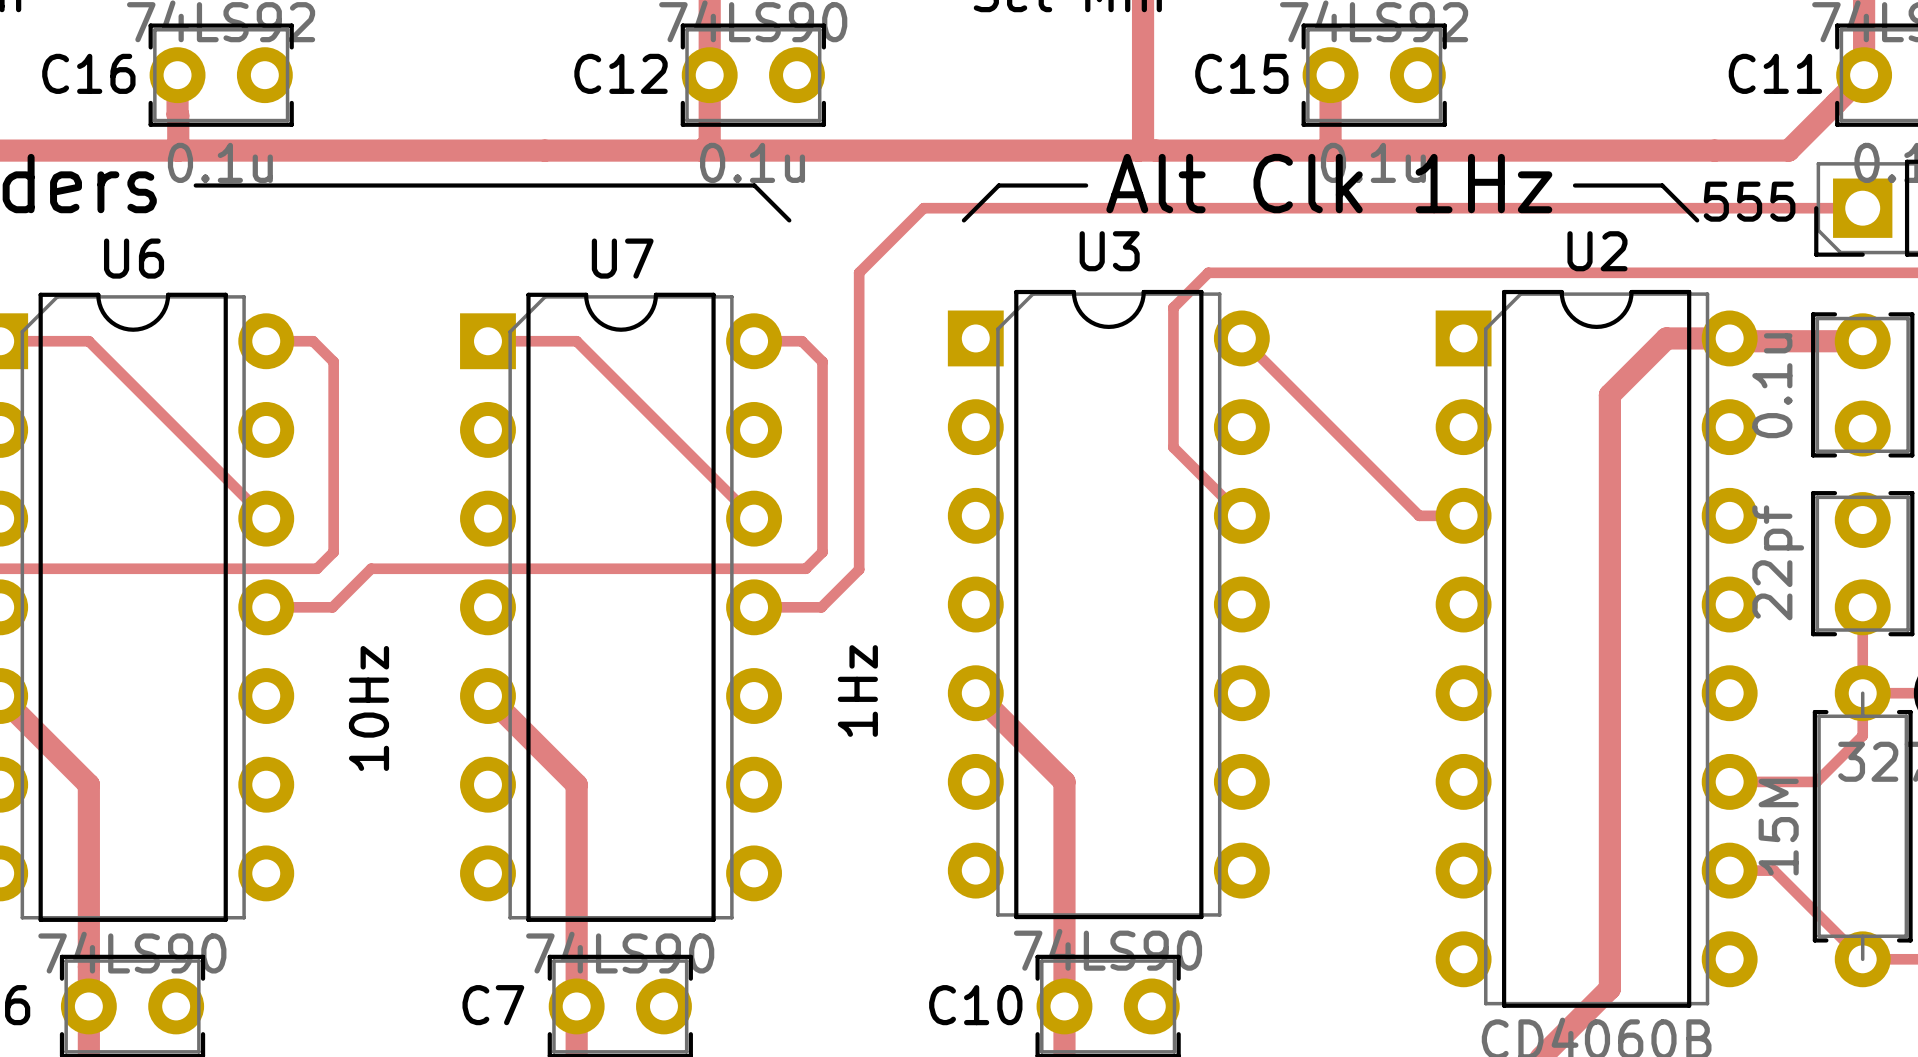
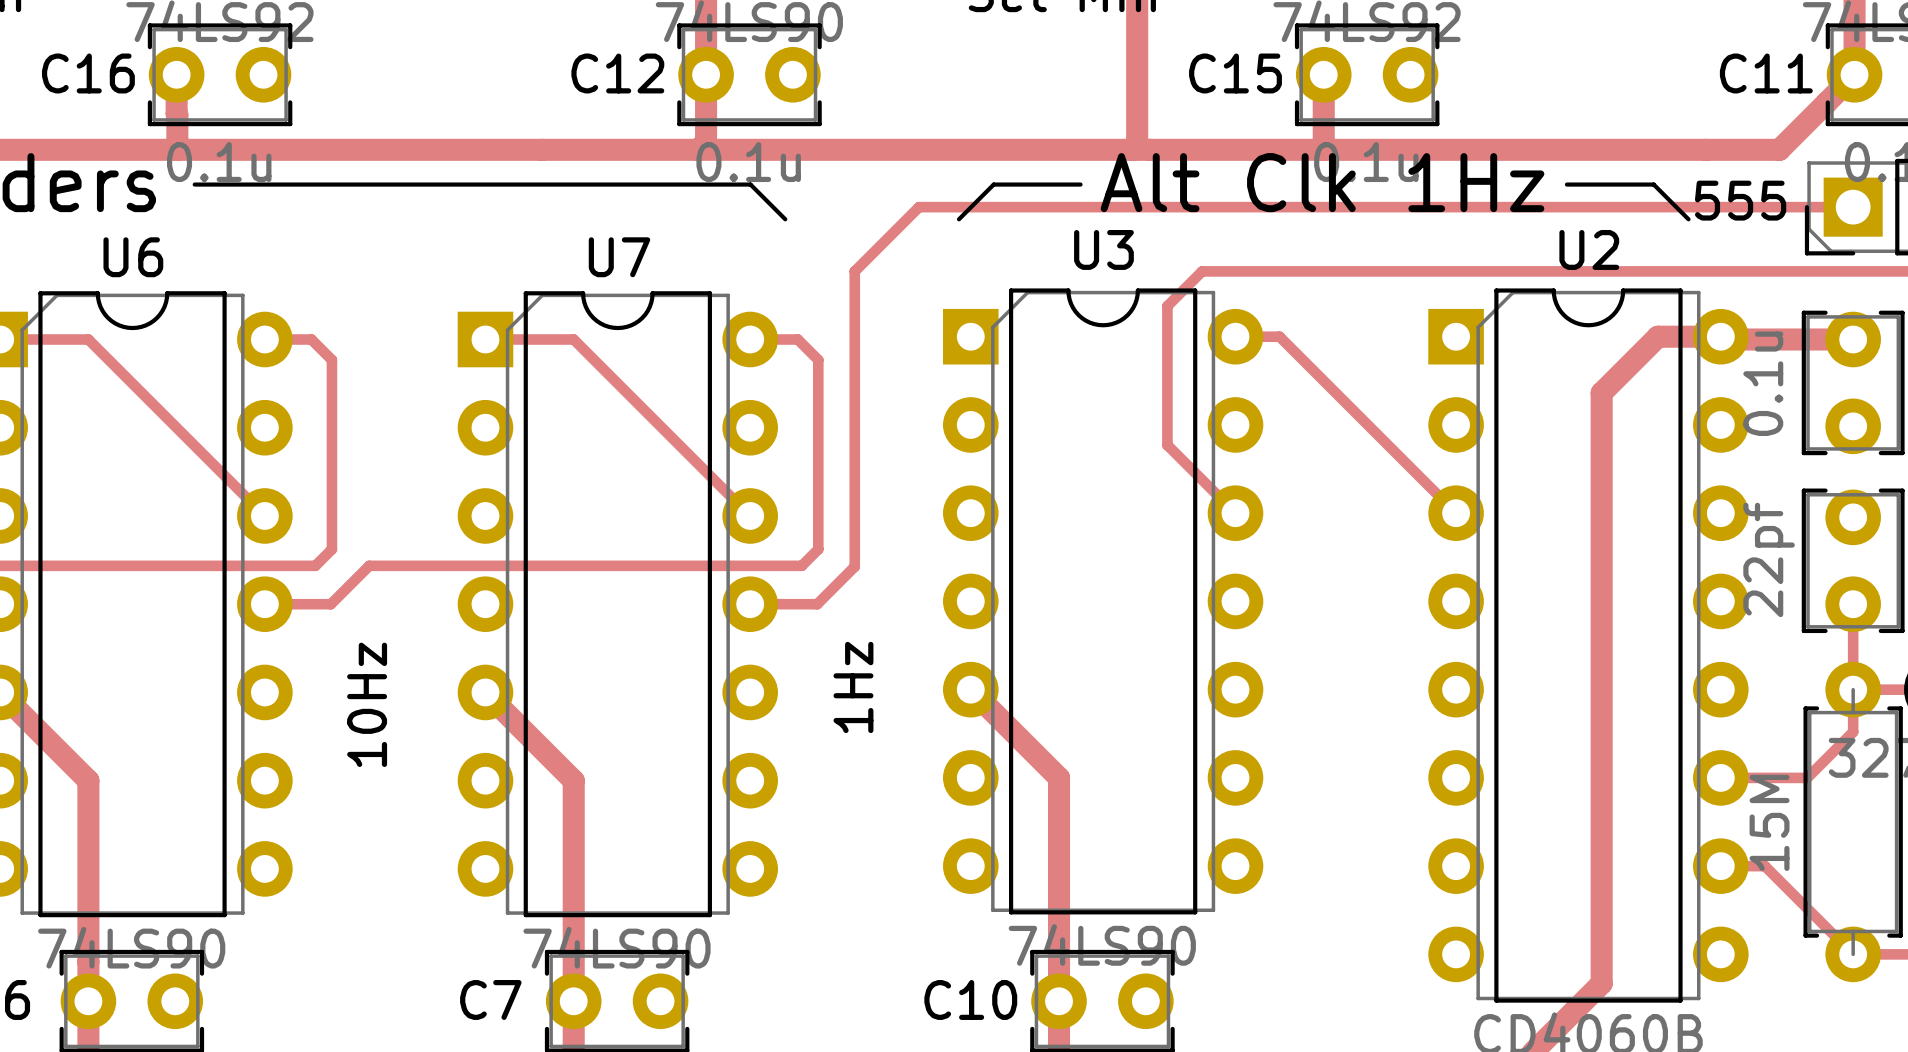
track: (1241, 338) (1419, 515) (1463, 515) -> (1235, 336) (1279, 336) (1456, 513)

